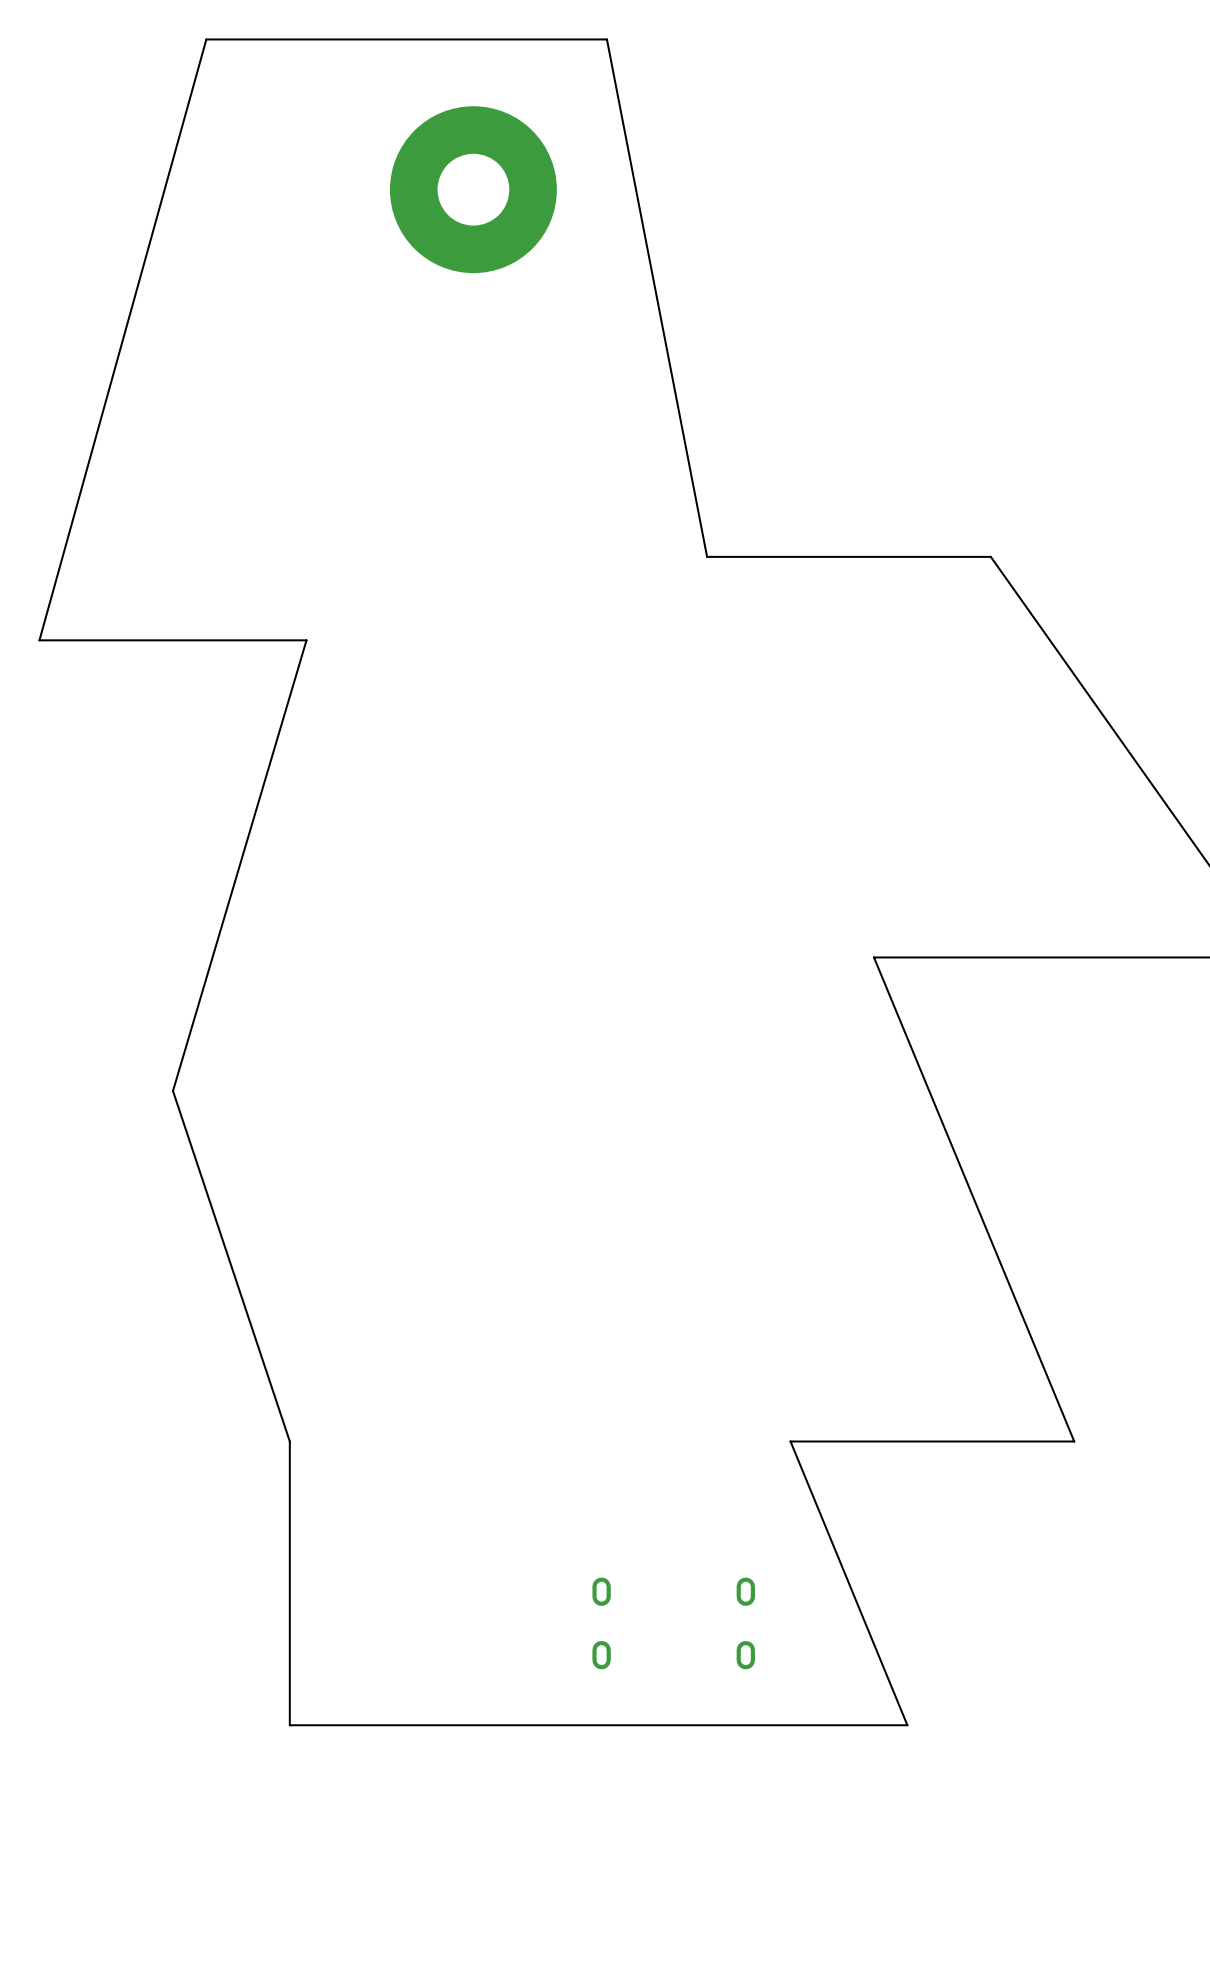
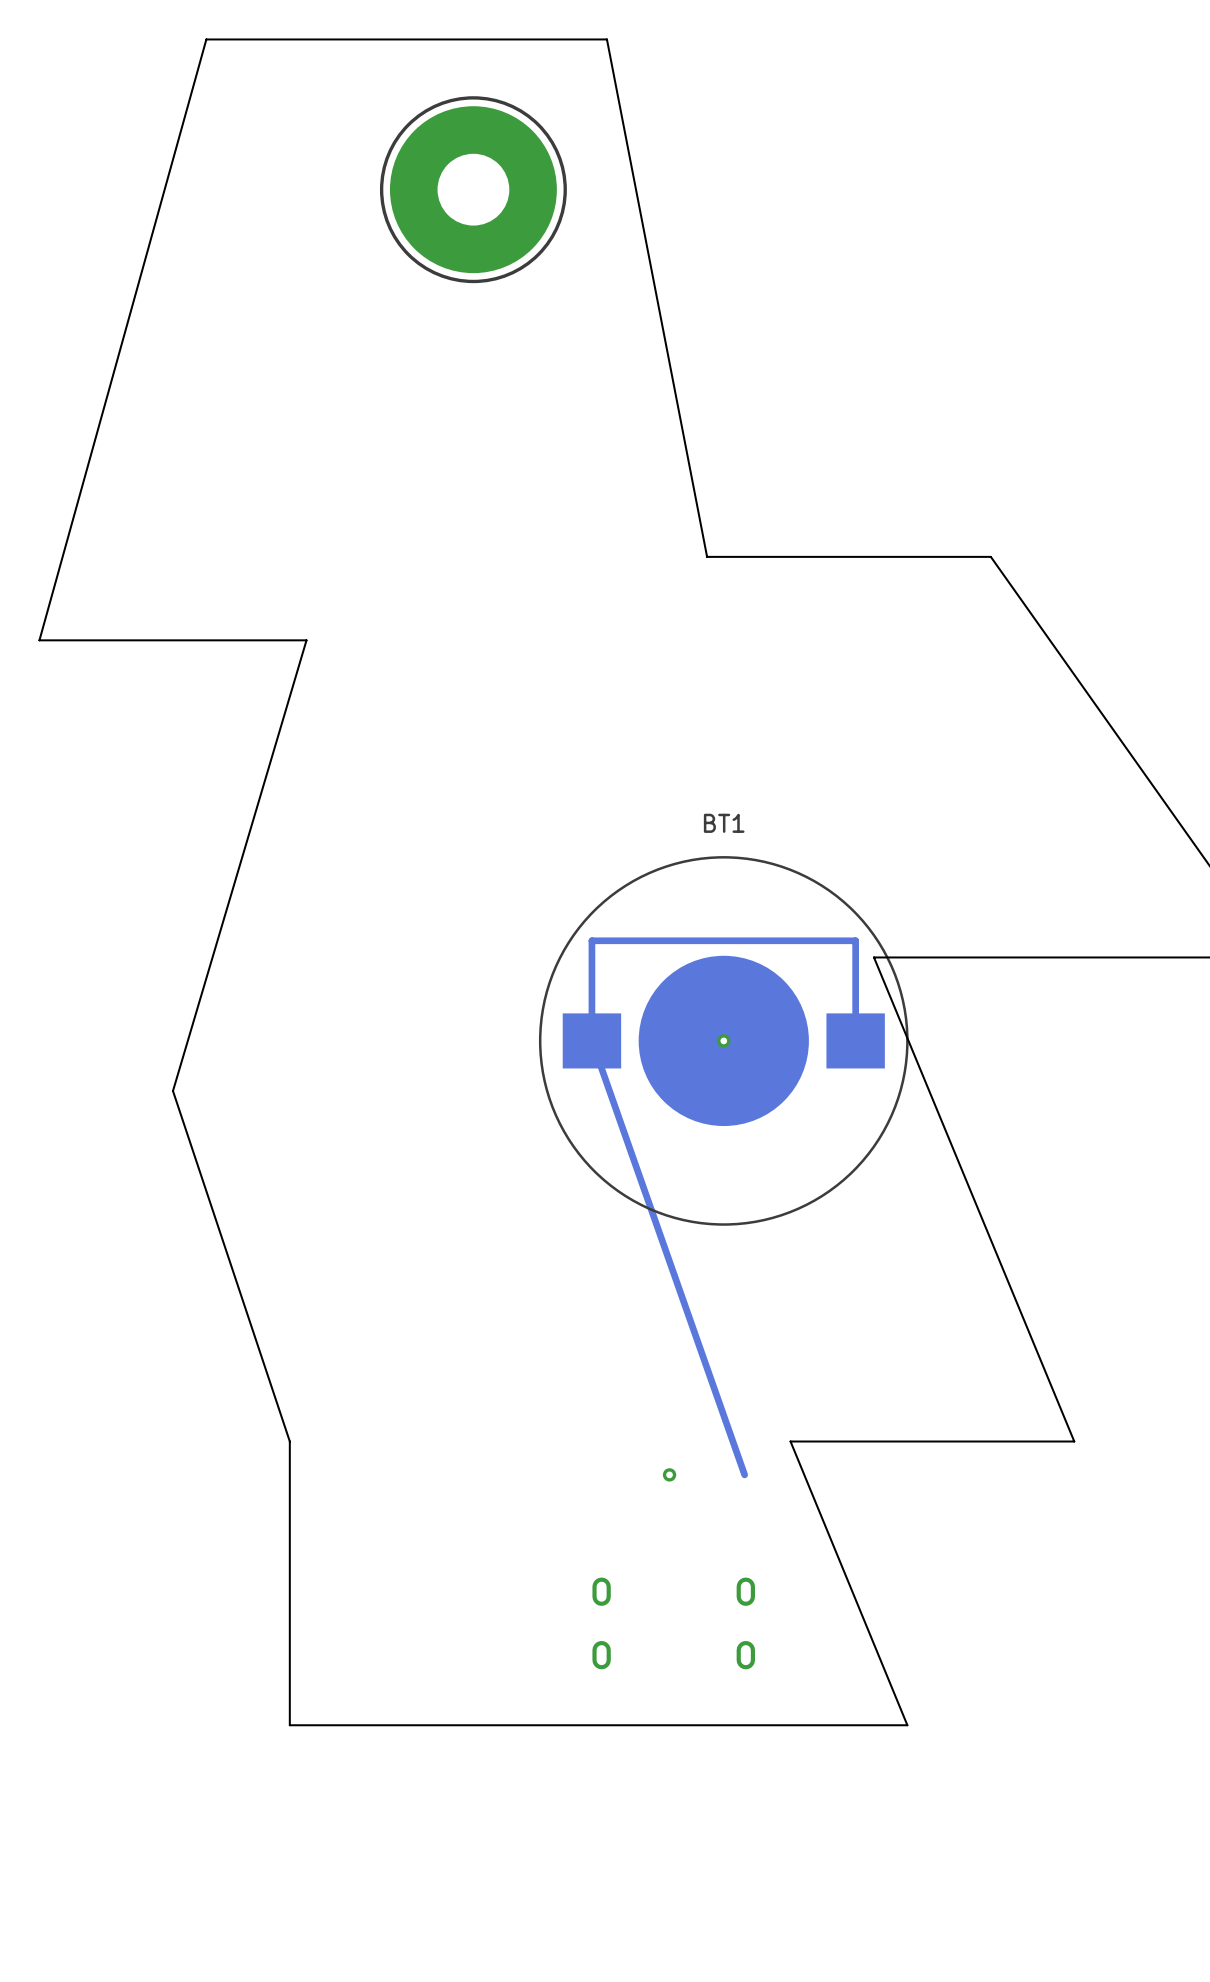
part footprint: [389, 106, 557, 274] -> [379, 96, 567, 284]
BT1: none -> (723, 1040)
via: none -> (723, 1040)
track: none -> (855, 1040) (855, 940) (591, 940) (591, 1040) (744, 1474)
via: none -> (669, 1474)

